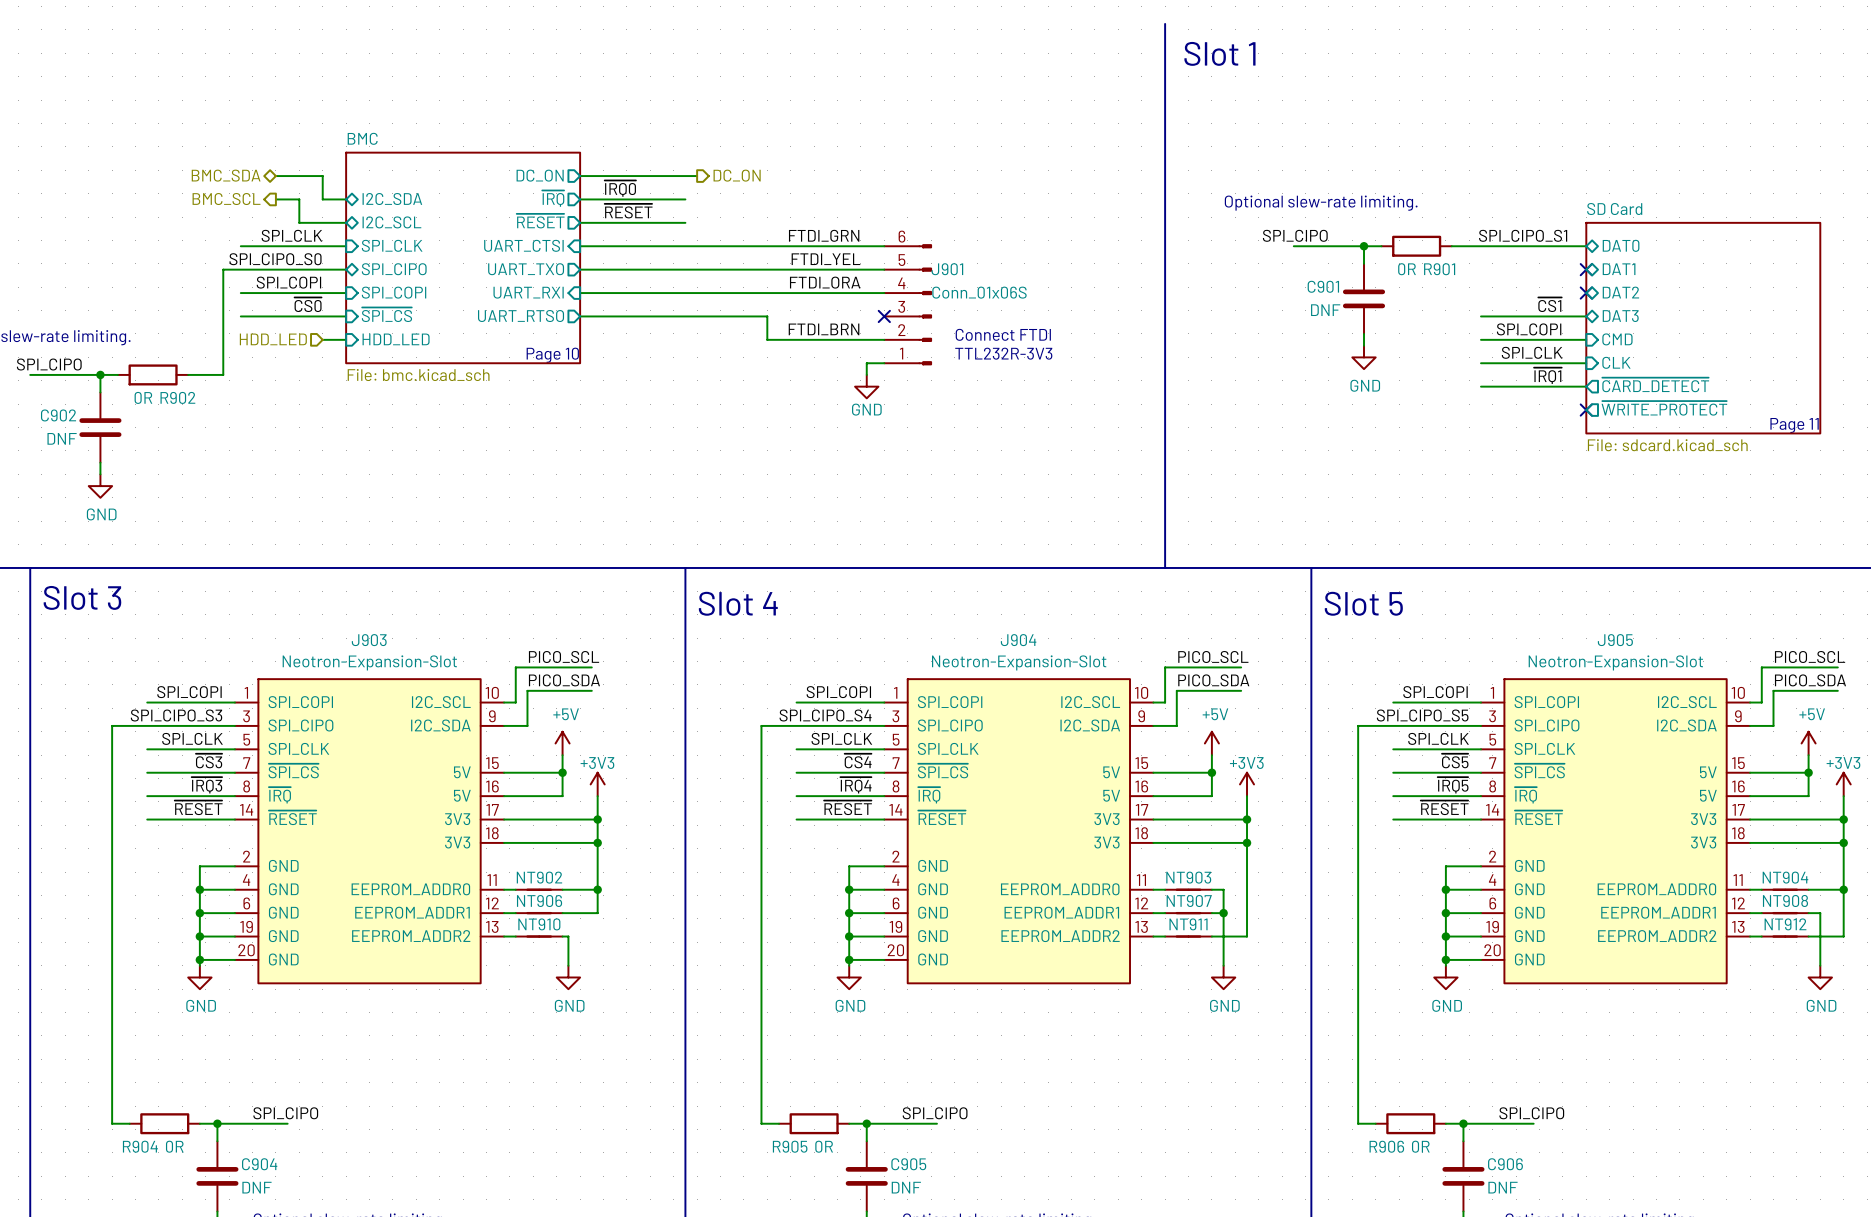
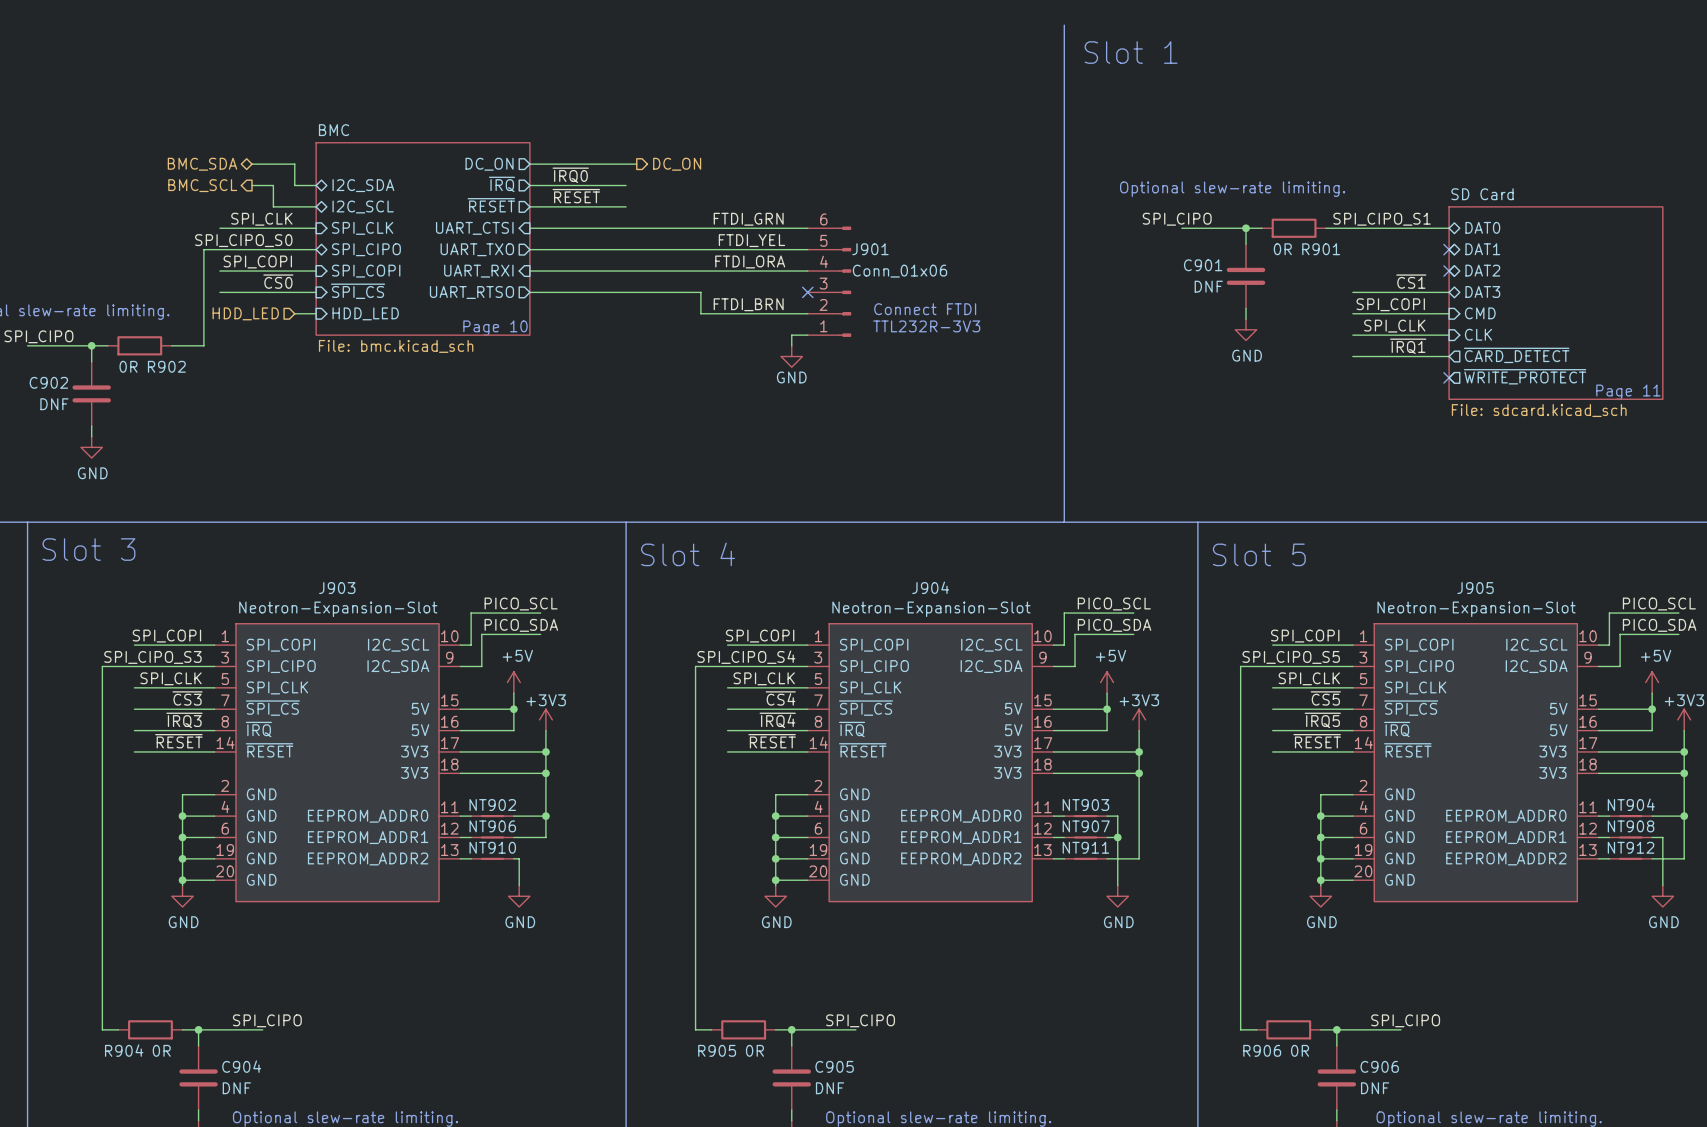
J901 value: Conn_01x06S (979, 292) -> Conn_01x06 (899, 271)

